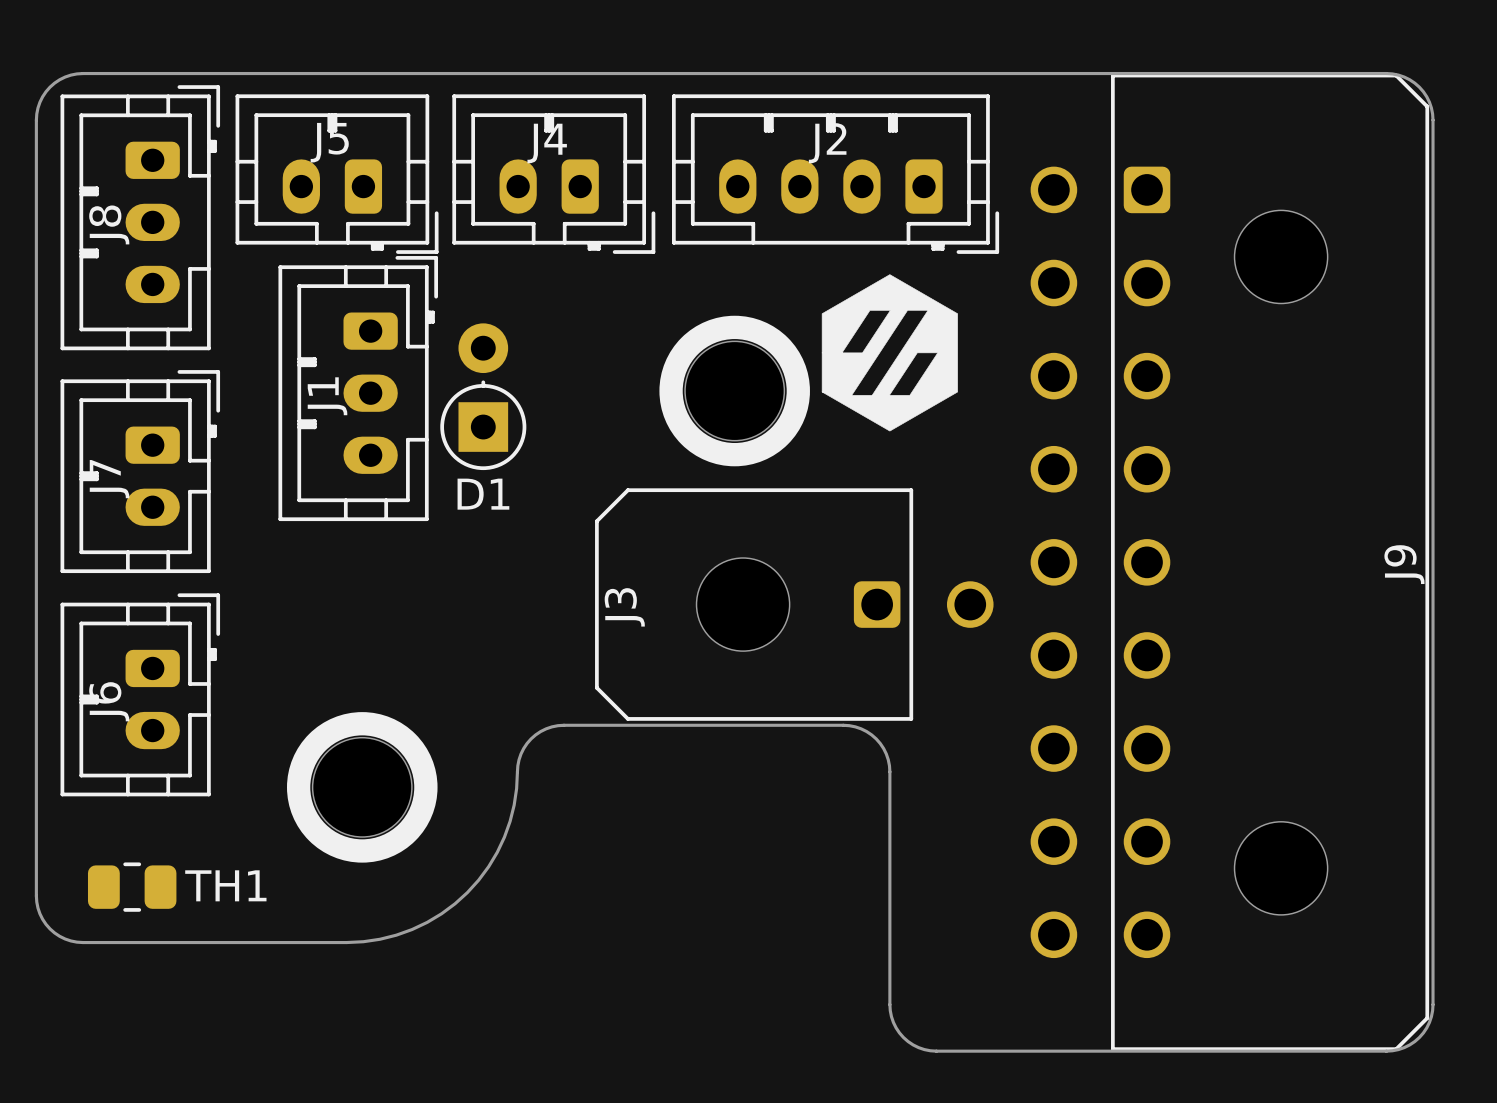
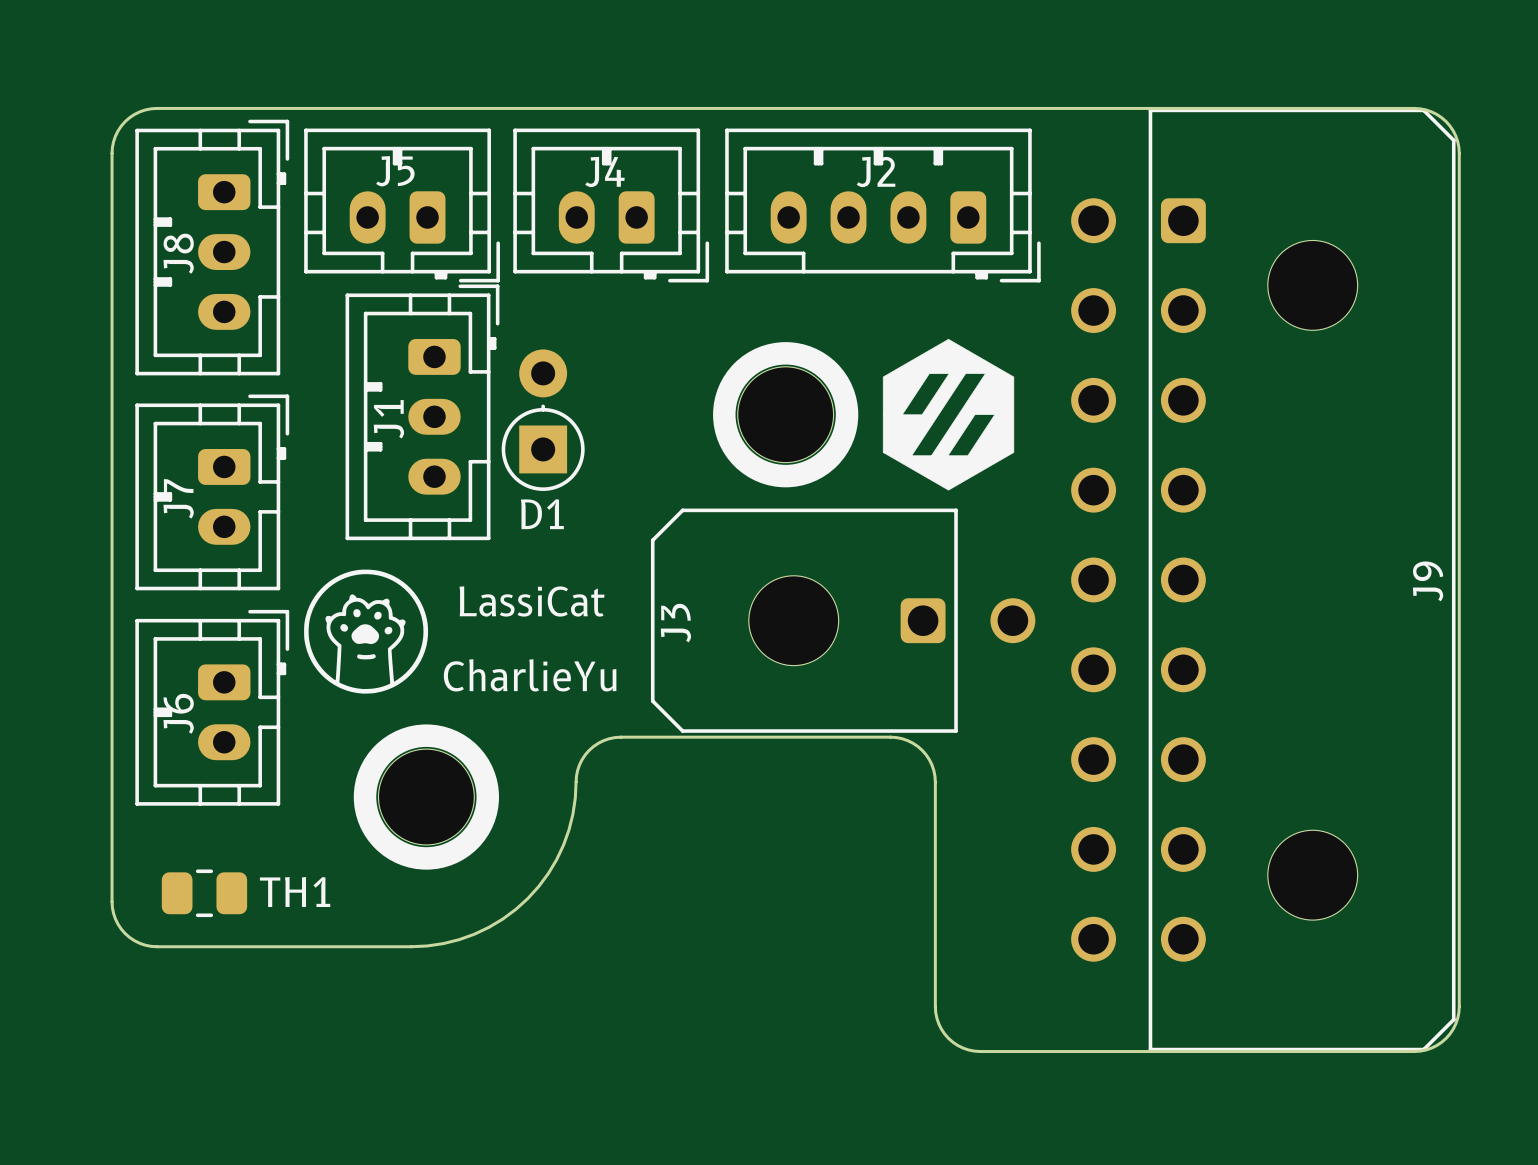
drawing position: (889, 352) -> (948, 414)
drawing: none -> [304, 569, 429, 694]
text: none -> LassiCat (532, 601)
text: none -> CharlieYu (530, 675)

